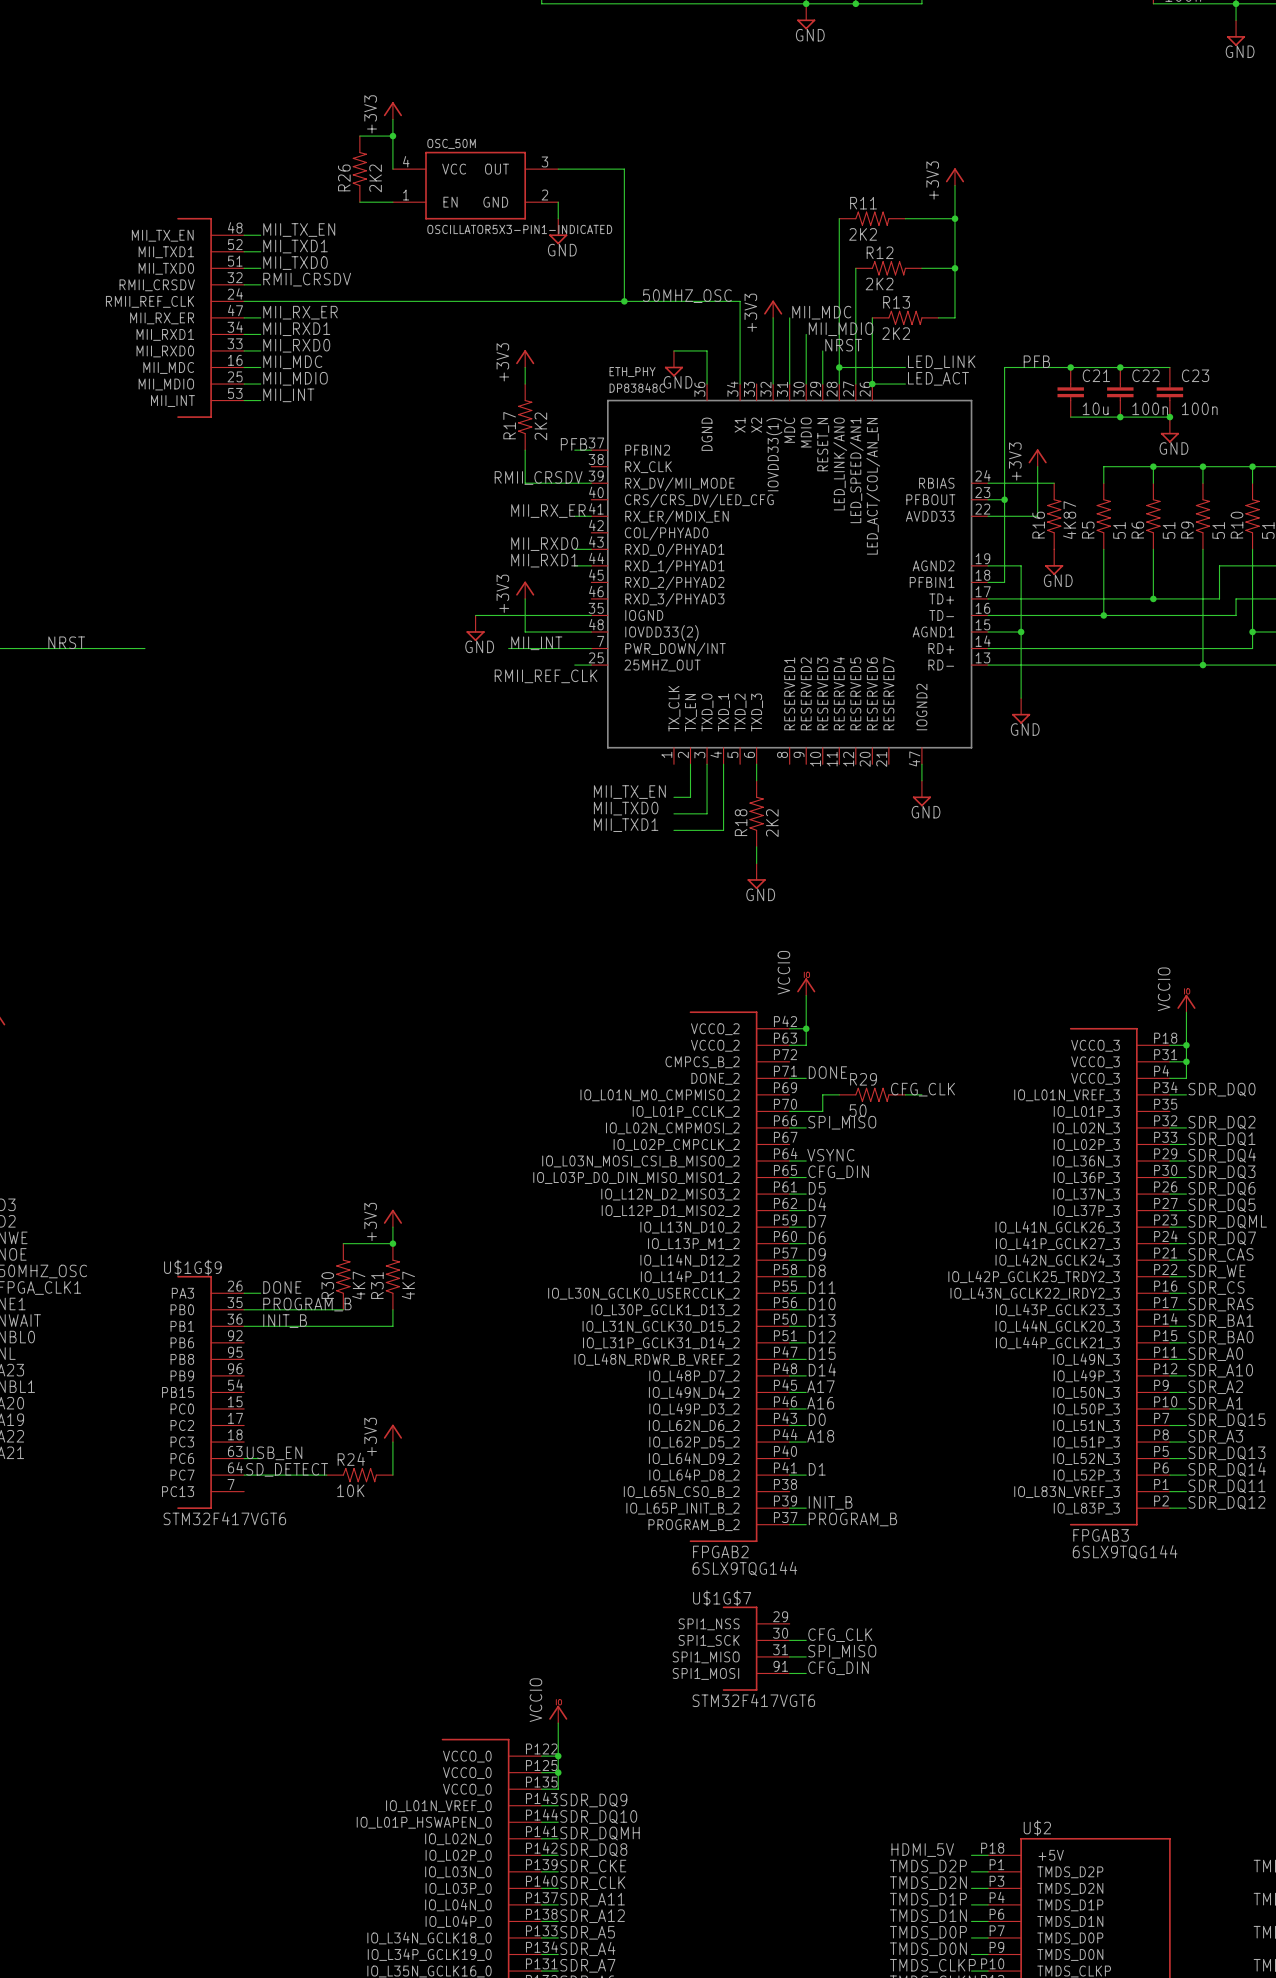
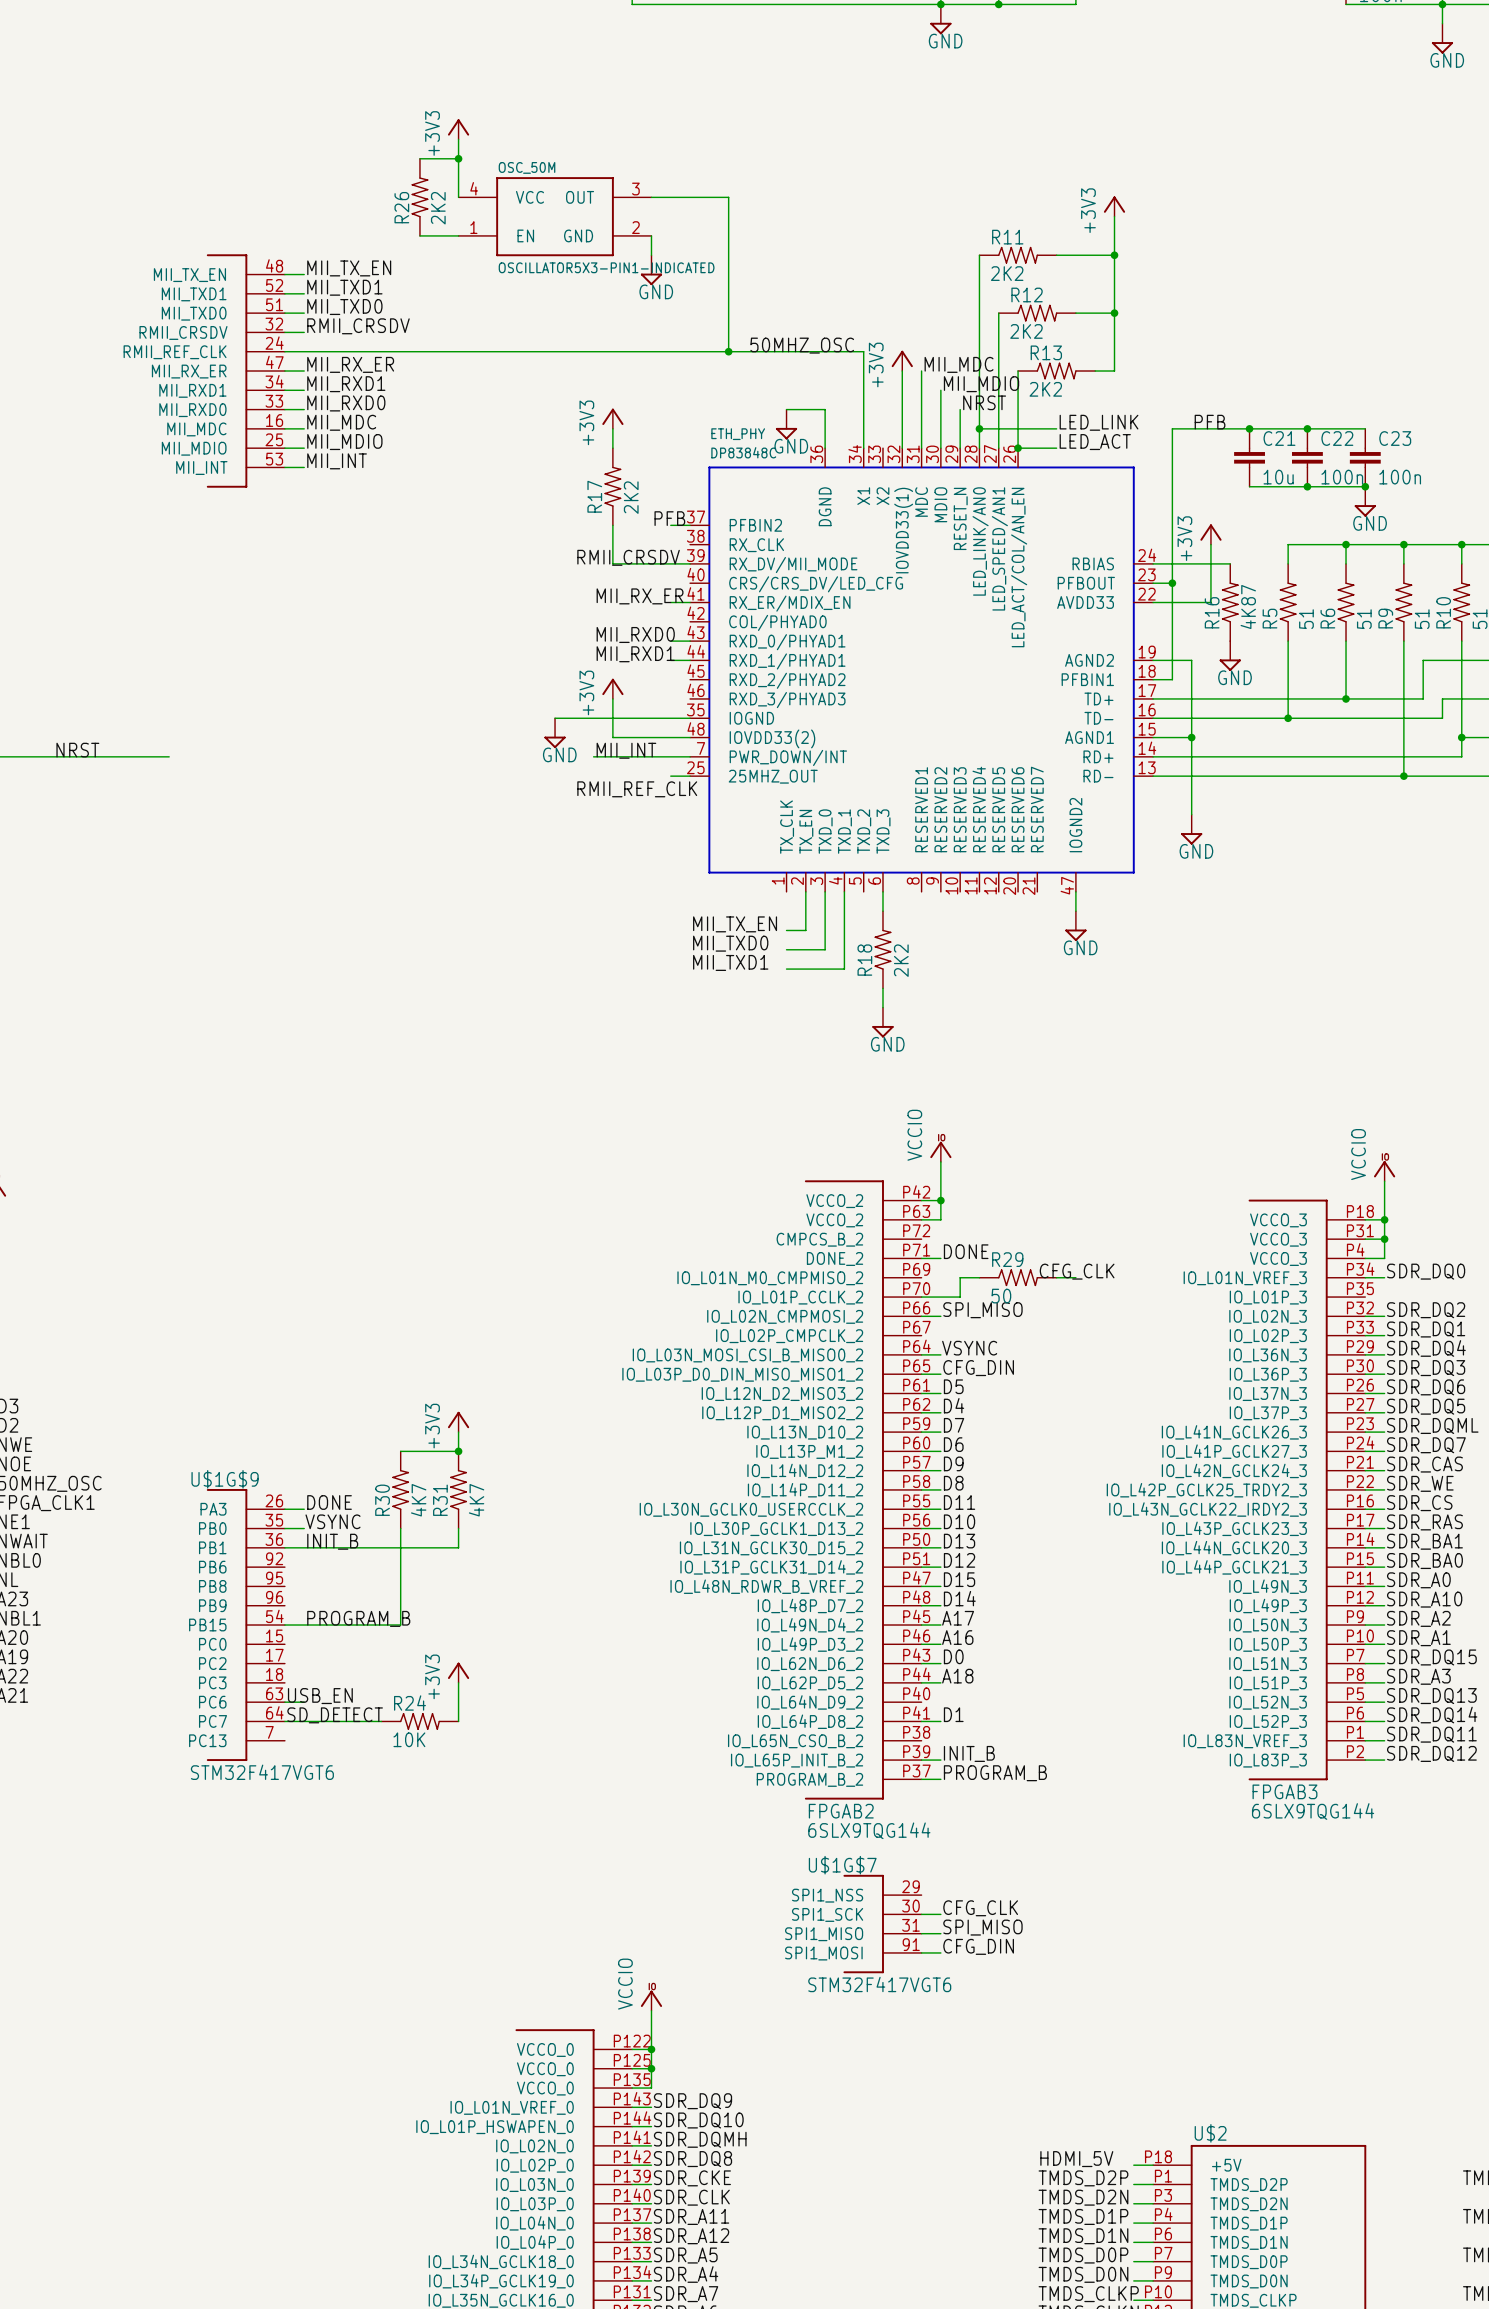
label: PROGRAM_B (307, 1304) -> VSYNC (333, 1521)
wire: (260, 1309) (343, 1309) -> (284, 1625) (400, 1625) (400, 1528)
label: none -> PROGRAM_B (358, 1618)

